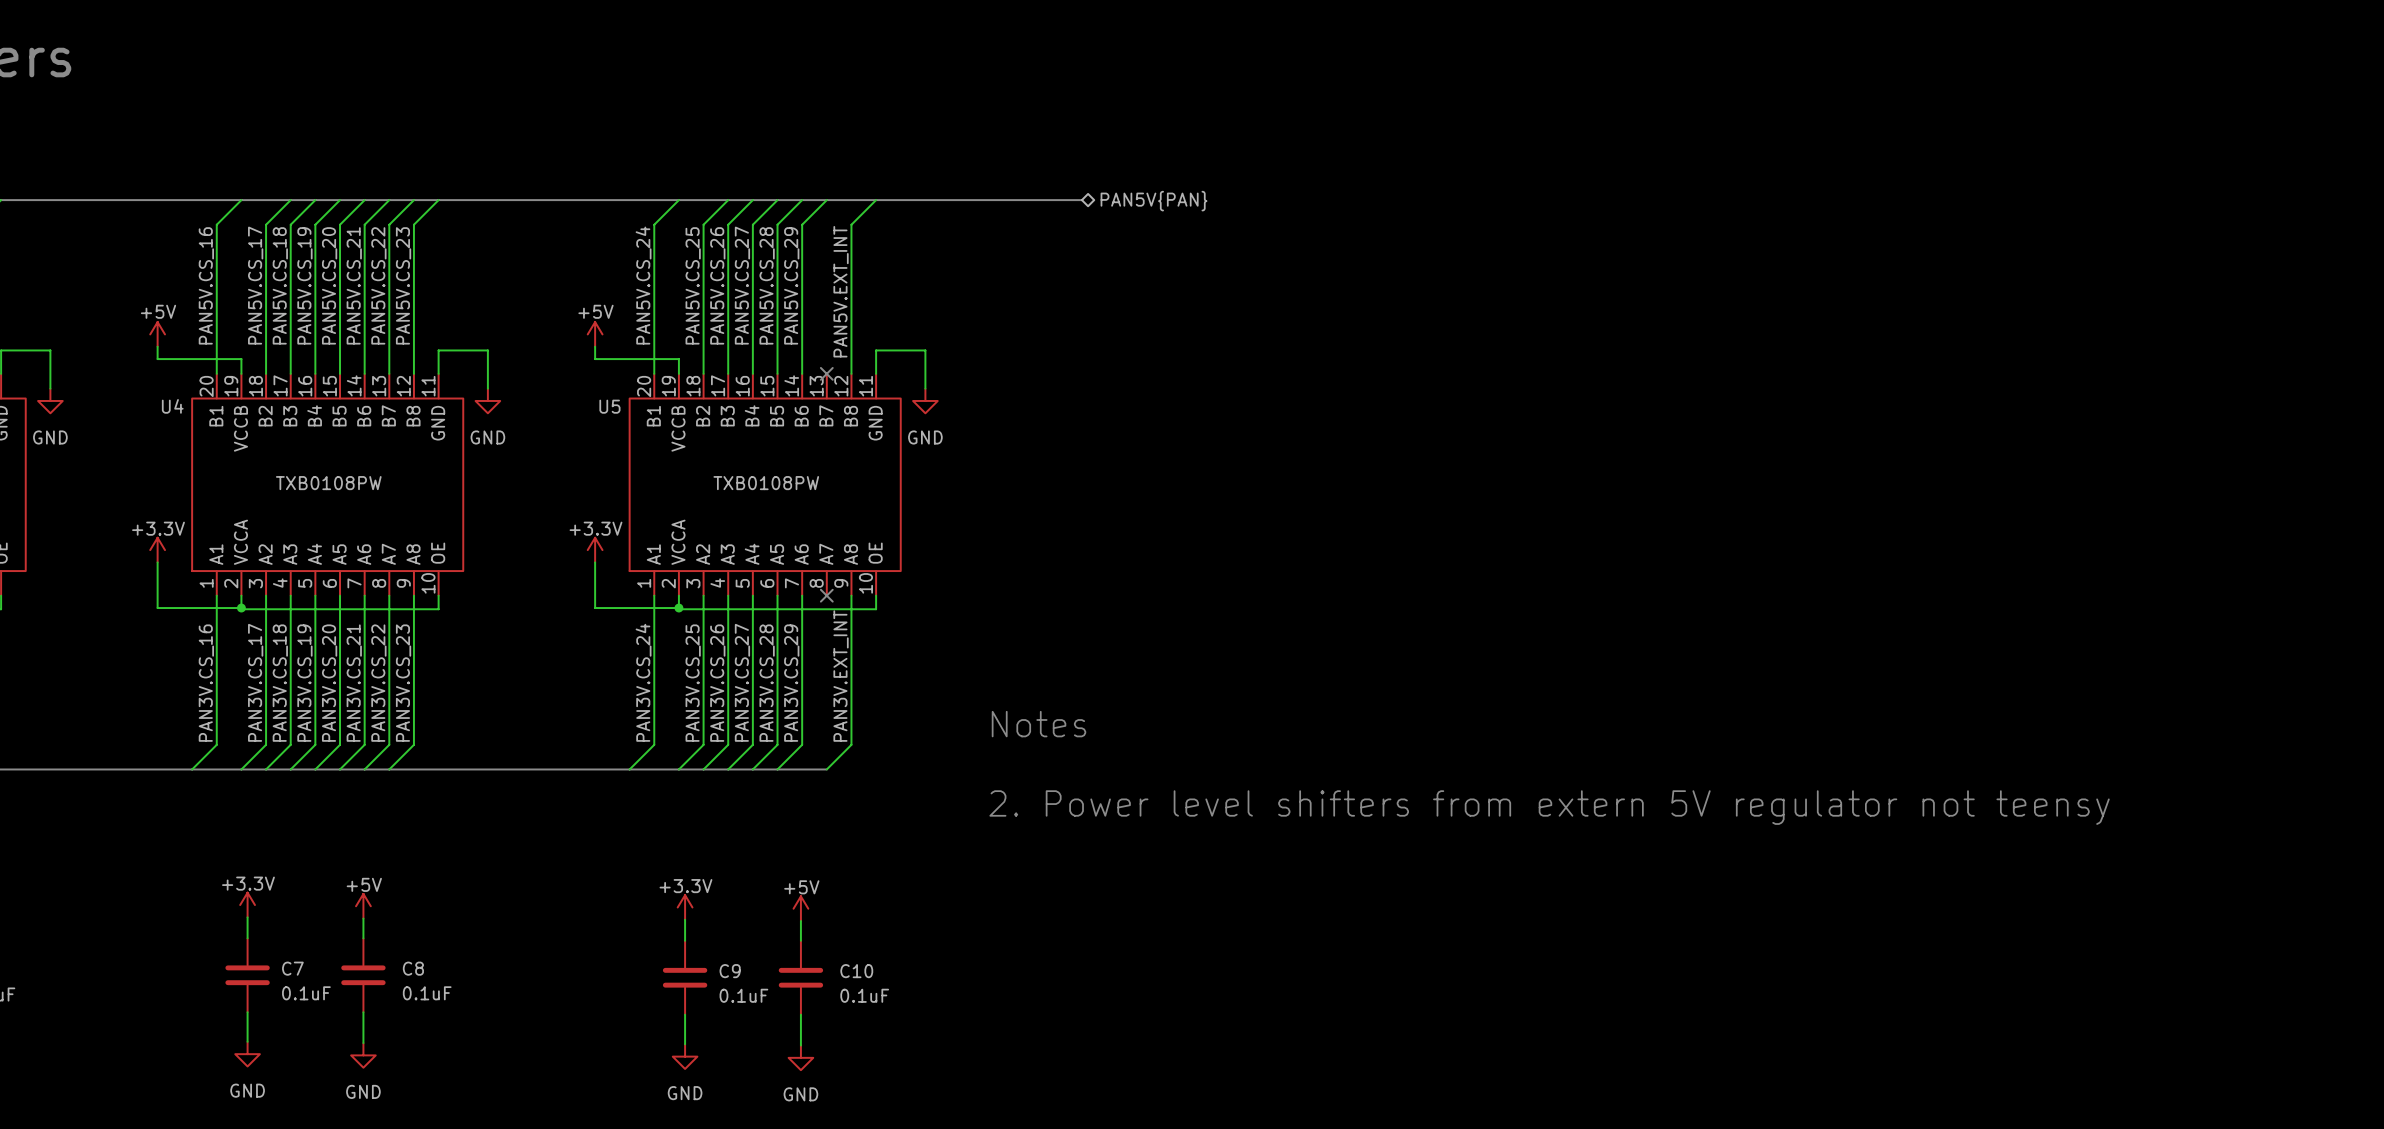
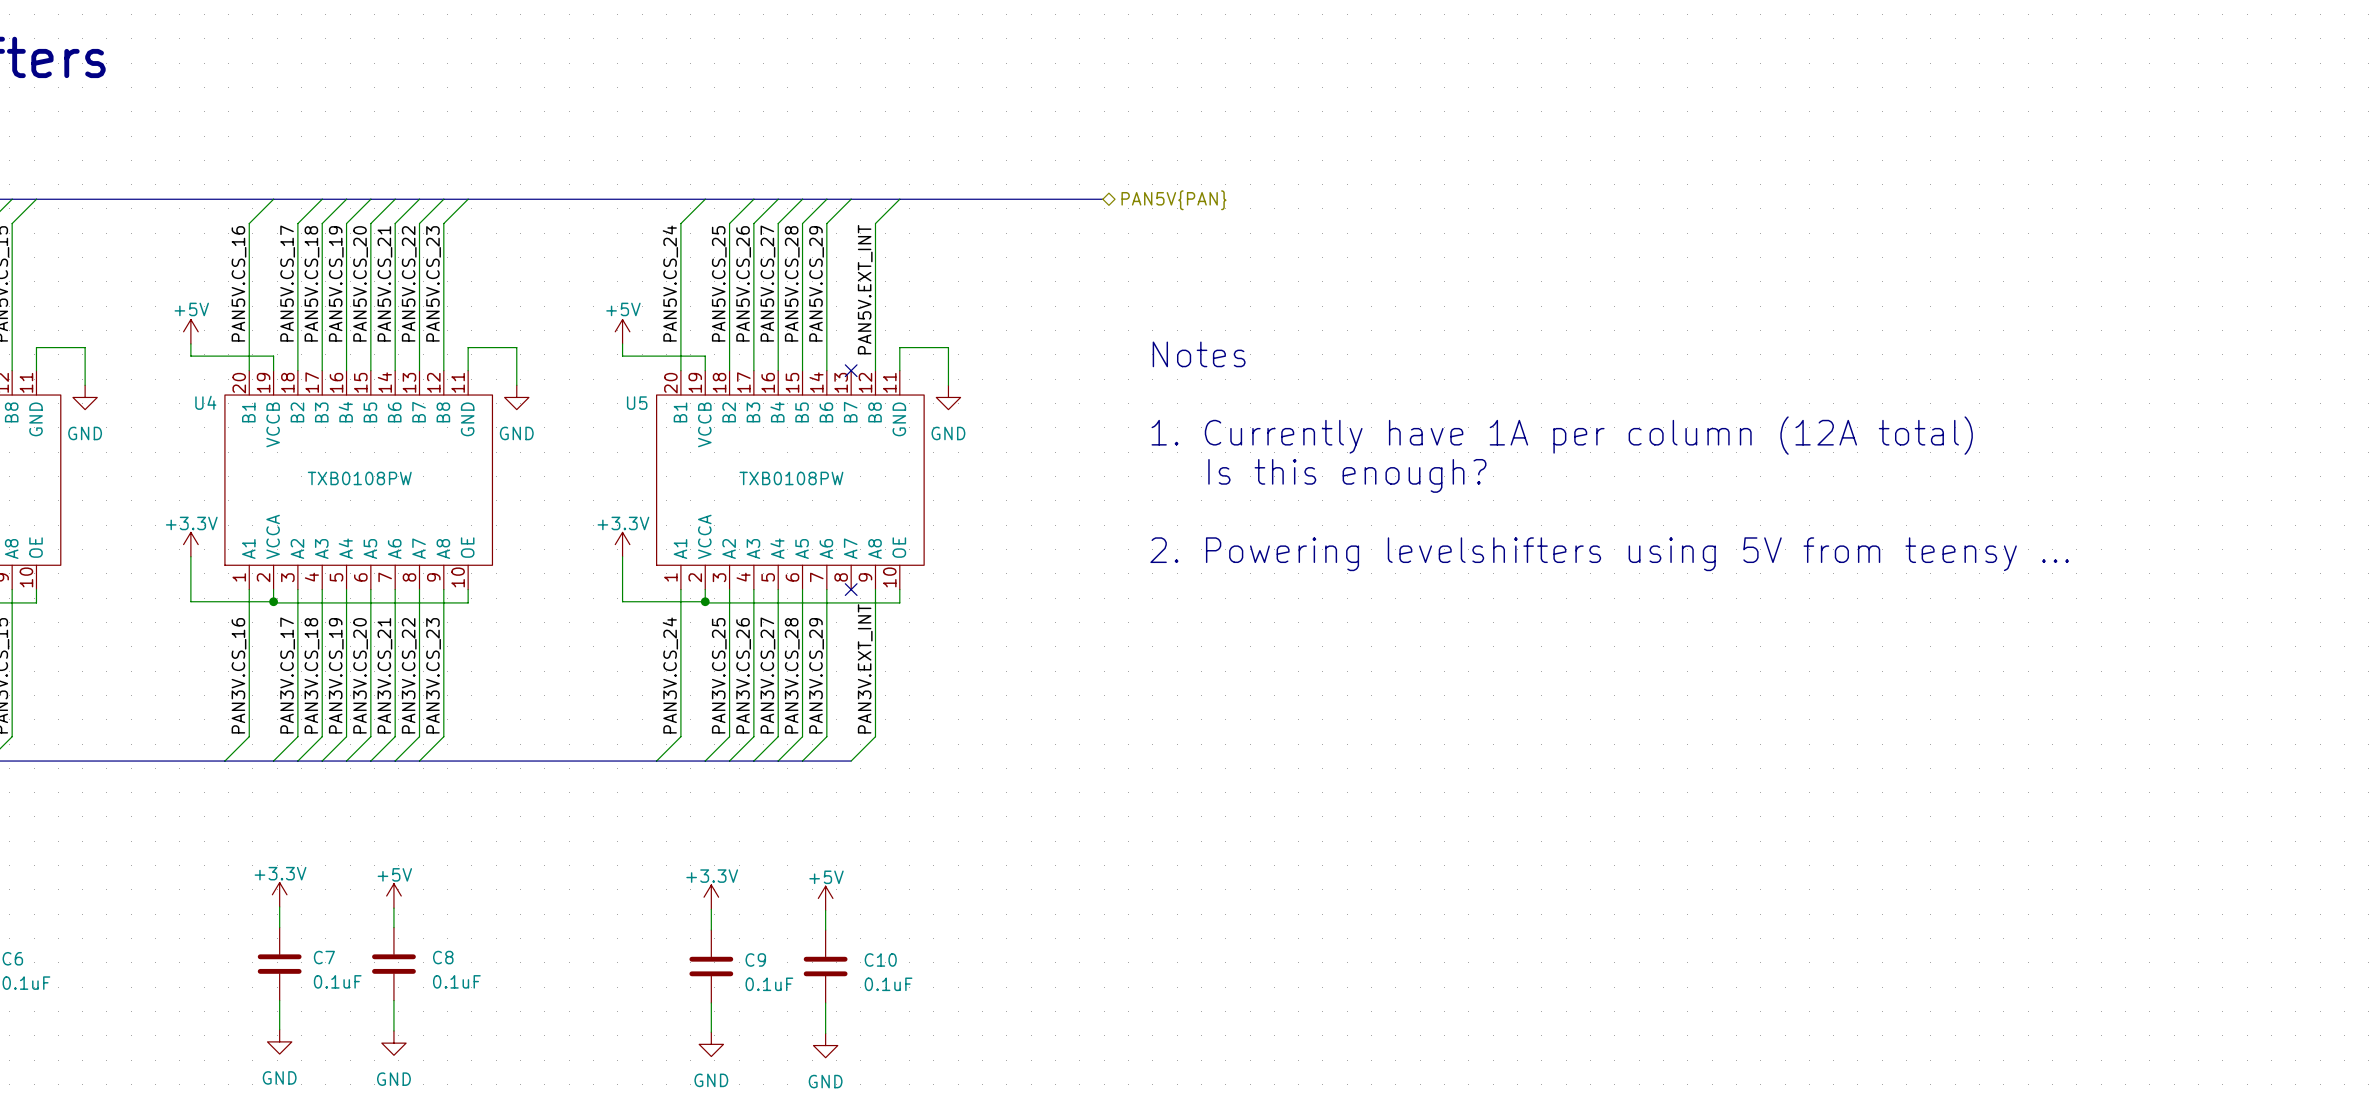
text: none -> Notes (1199, 354)
text: none -> 1. Currently have 1A per column (12A total) (1562, 435)
text: none -> Is this enough? (1347, 475)
text: none -> 2. Powering levelshifters using 5V from teensy ... (1609, 554)
text: Notes (1038, 724) -> none
text: 2. Power level shifters from extern 5V regulator not teensy (1549, 807) -> none

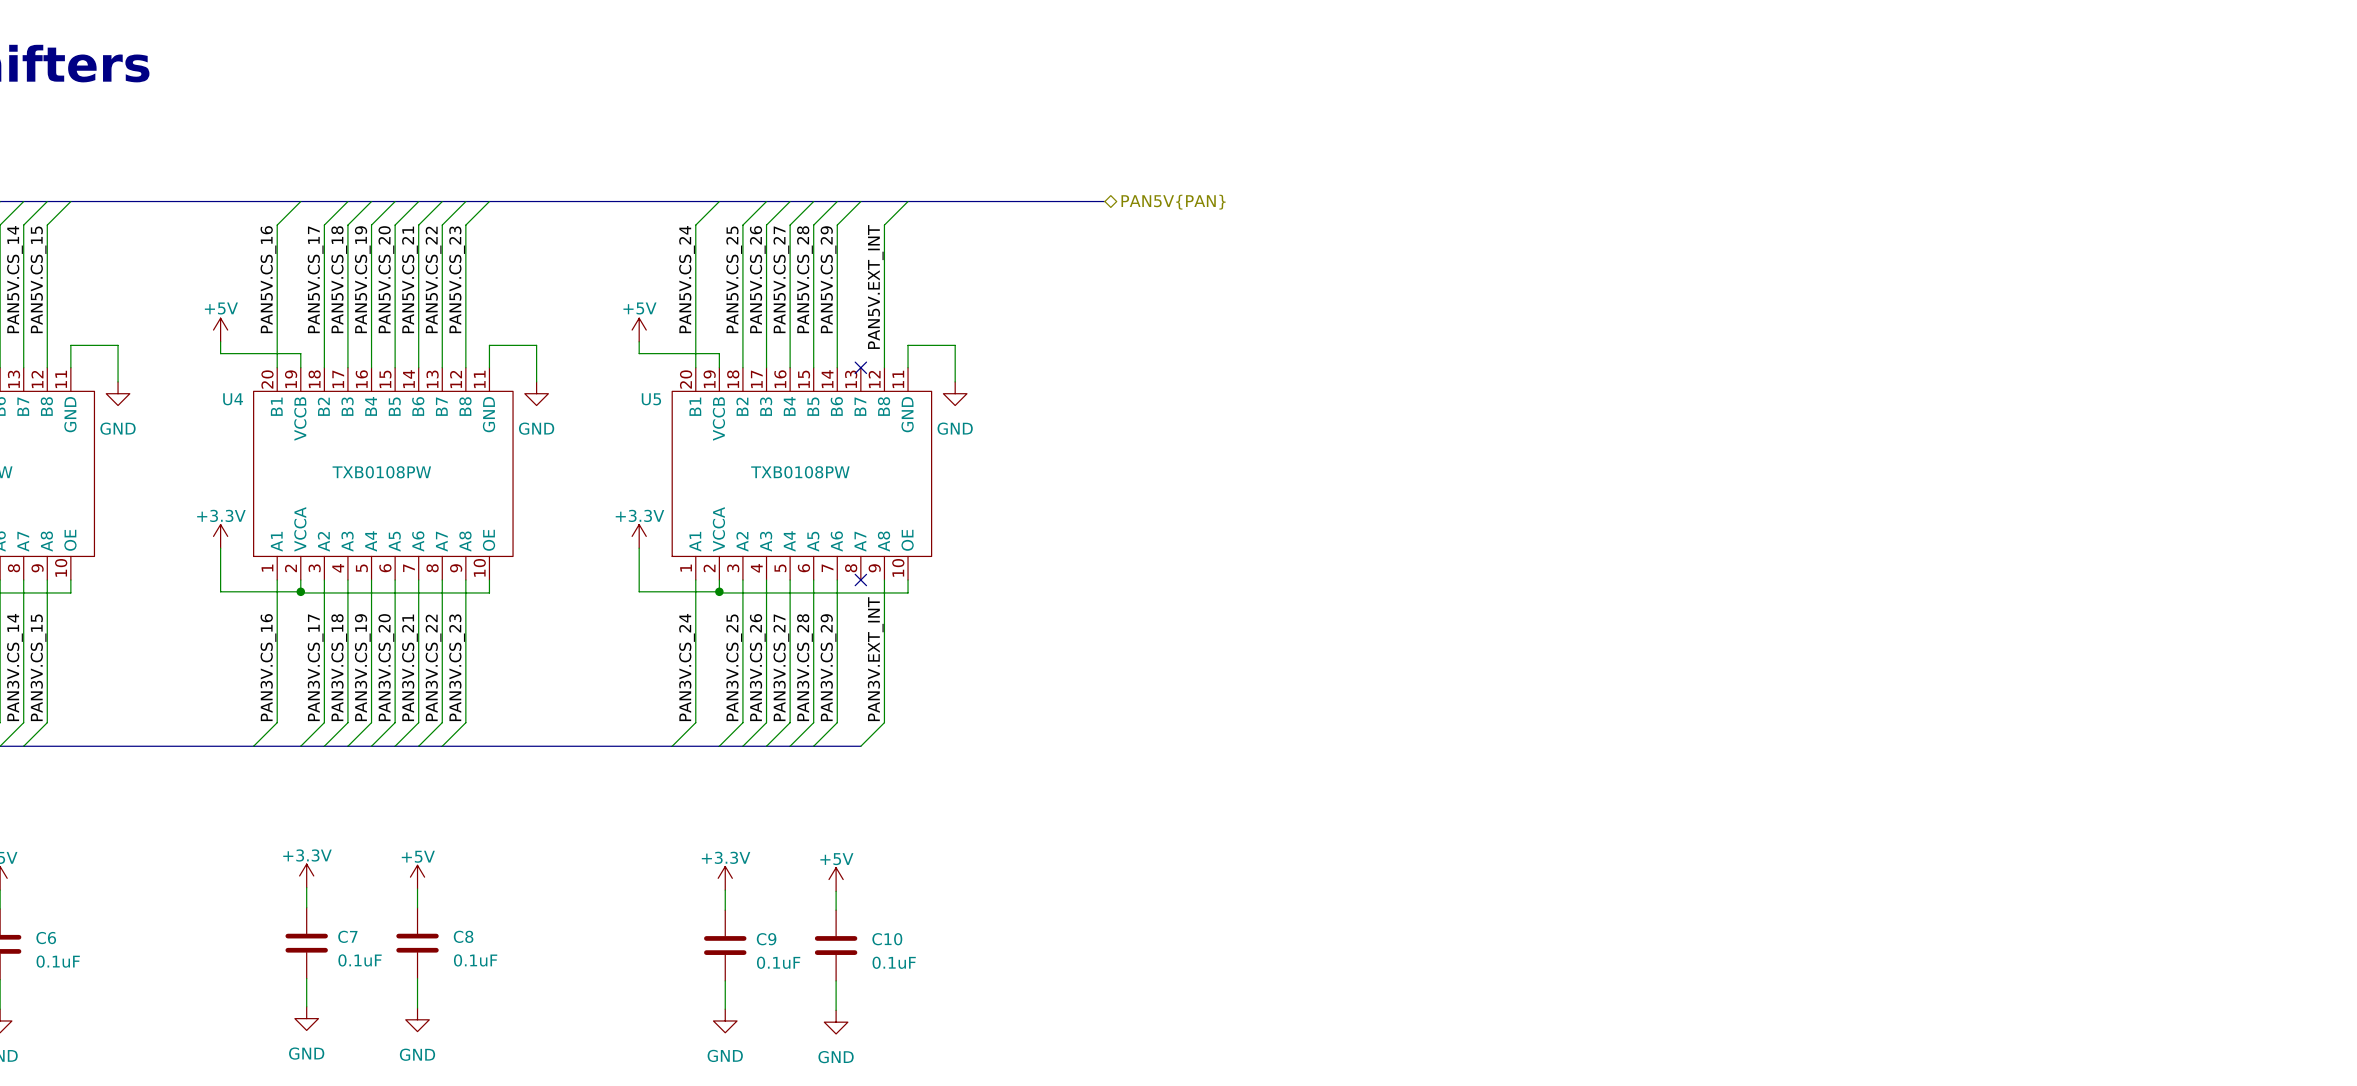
text: Notes (1199, 354) -> none
text: 1. Currently have 1A per column (12A total) (1562, 435) -> none
text: Is this enough? (1347, 475) -> none
text: 2. Powering levelshifters using 5V from teensy ... (1609, 554) -> none

